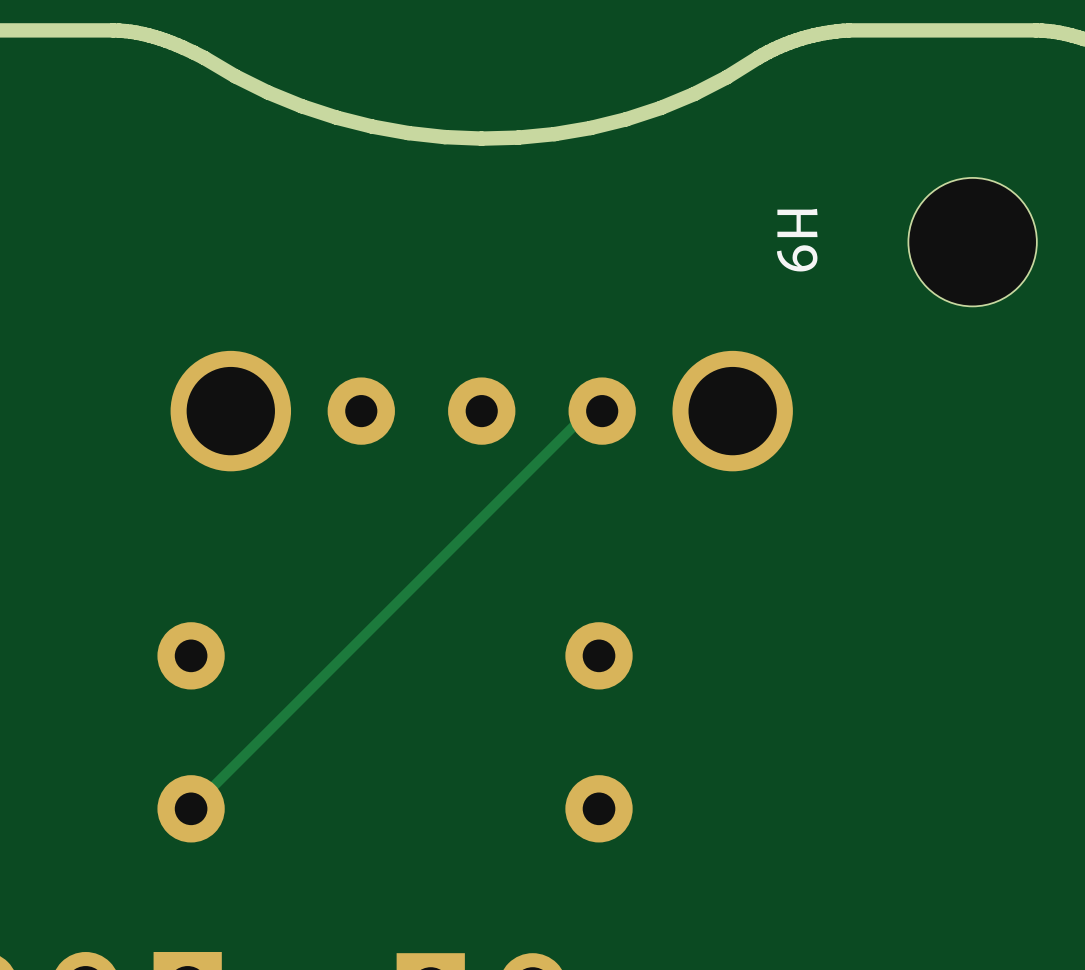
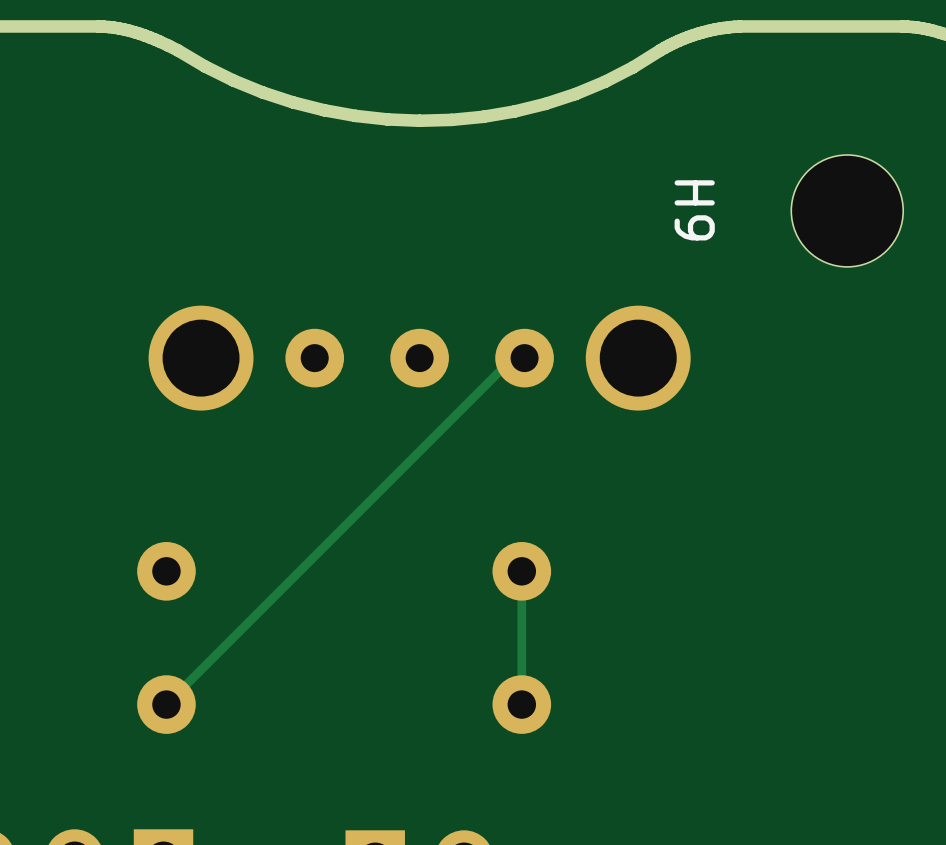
track: none -> (521, 571) (521, 704)

